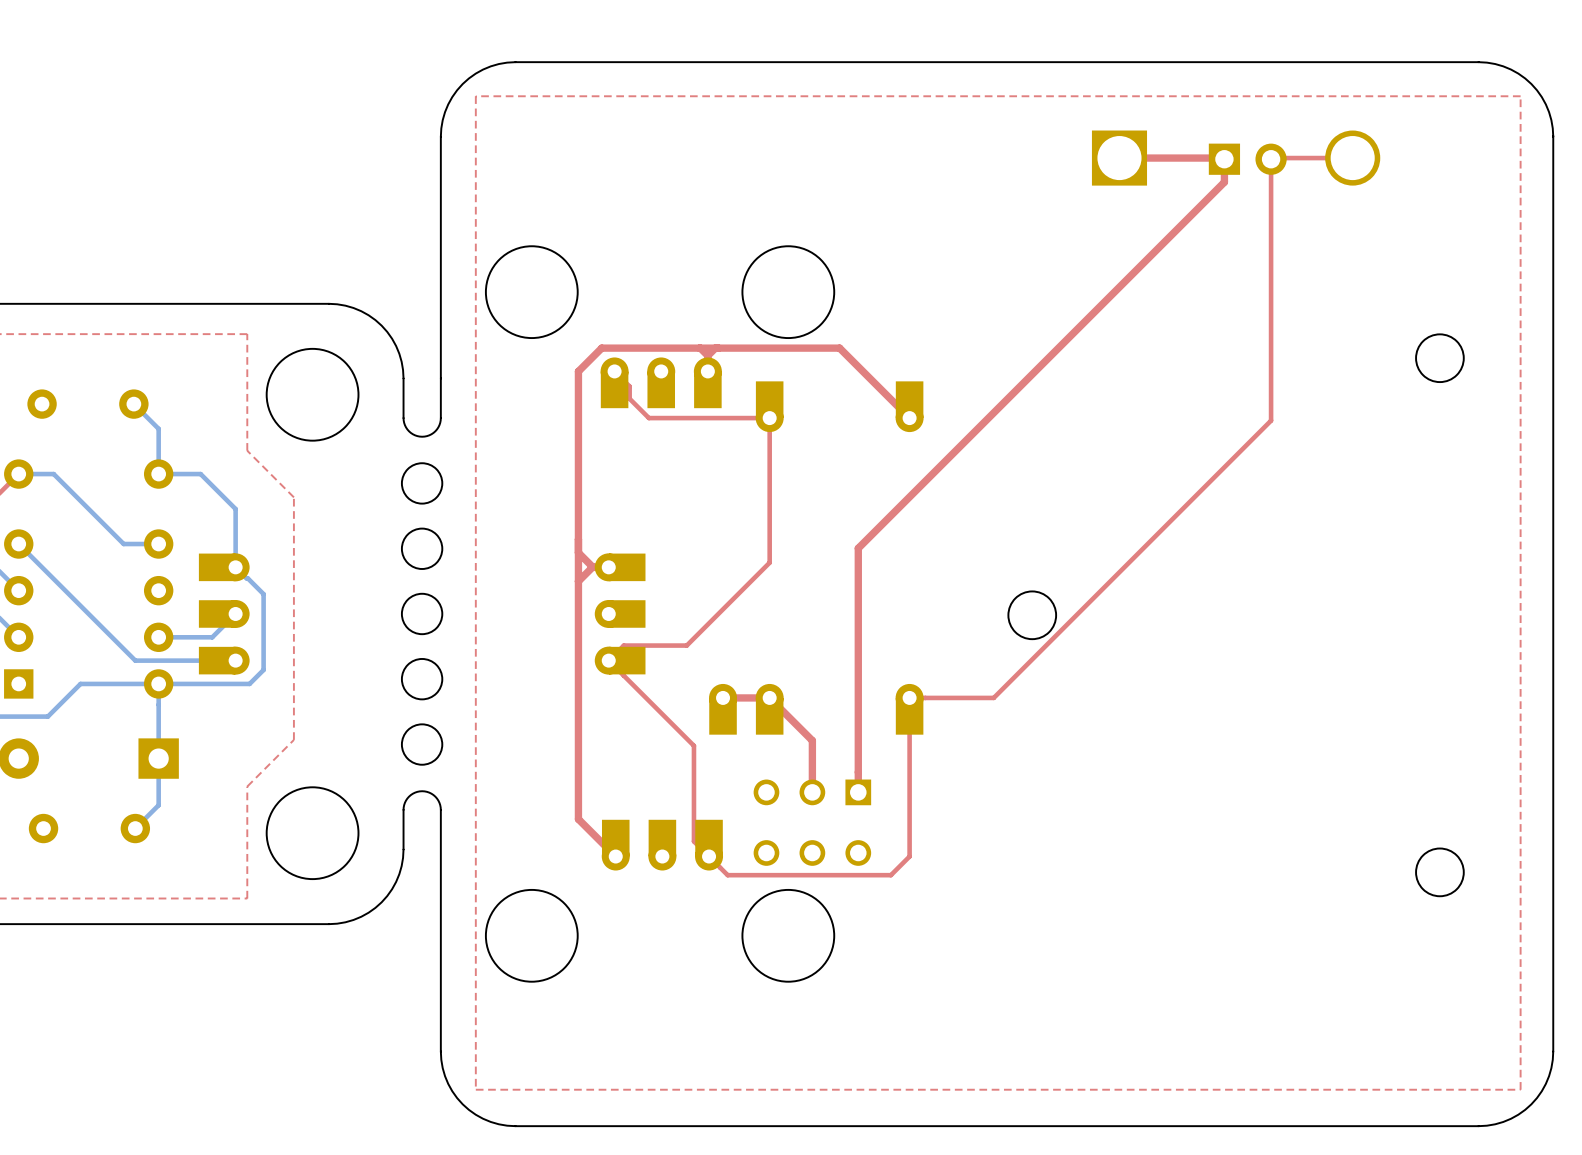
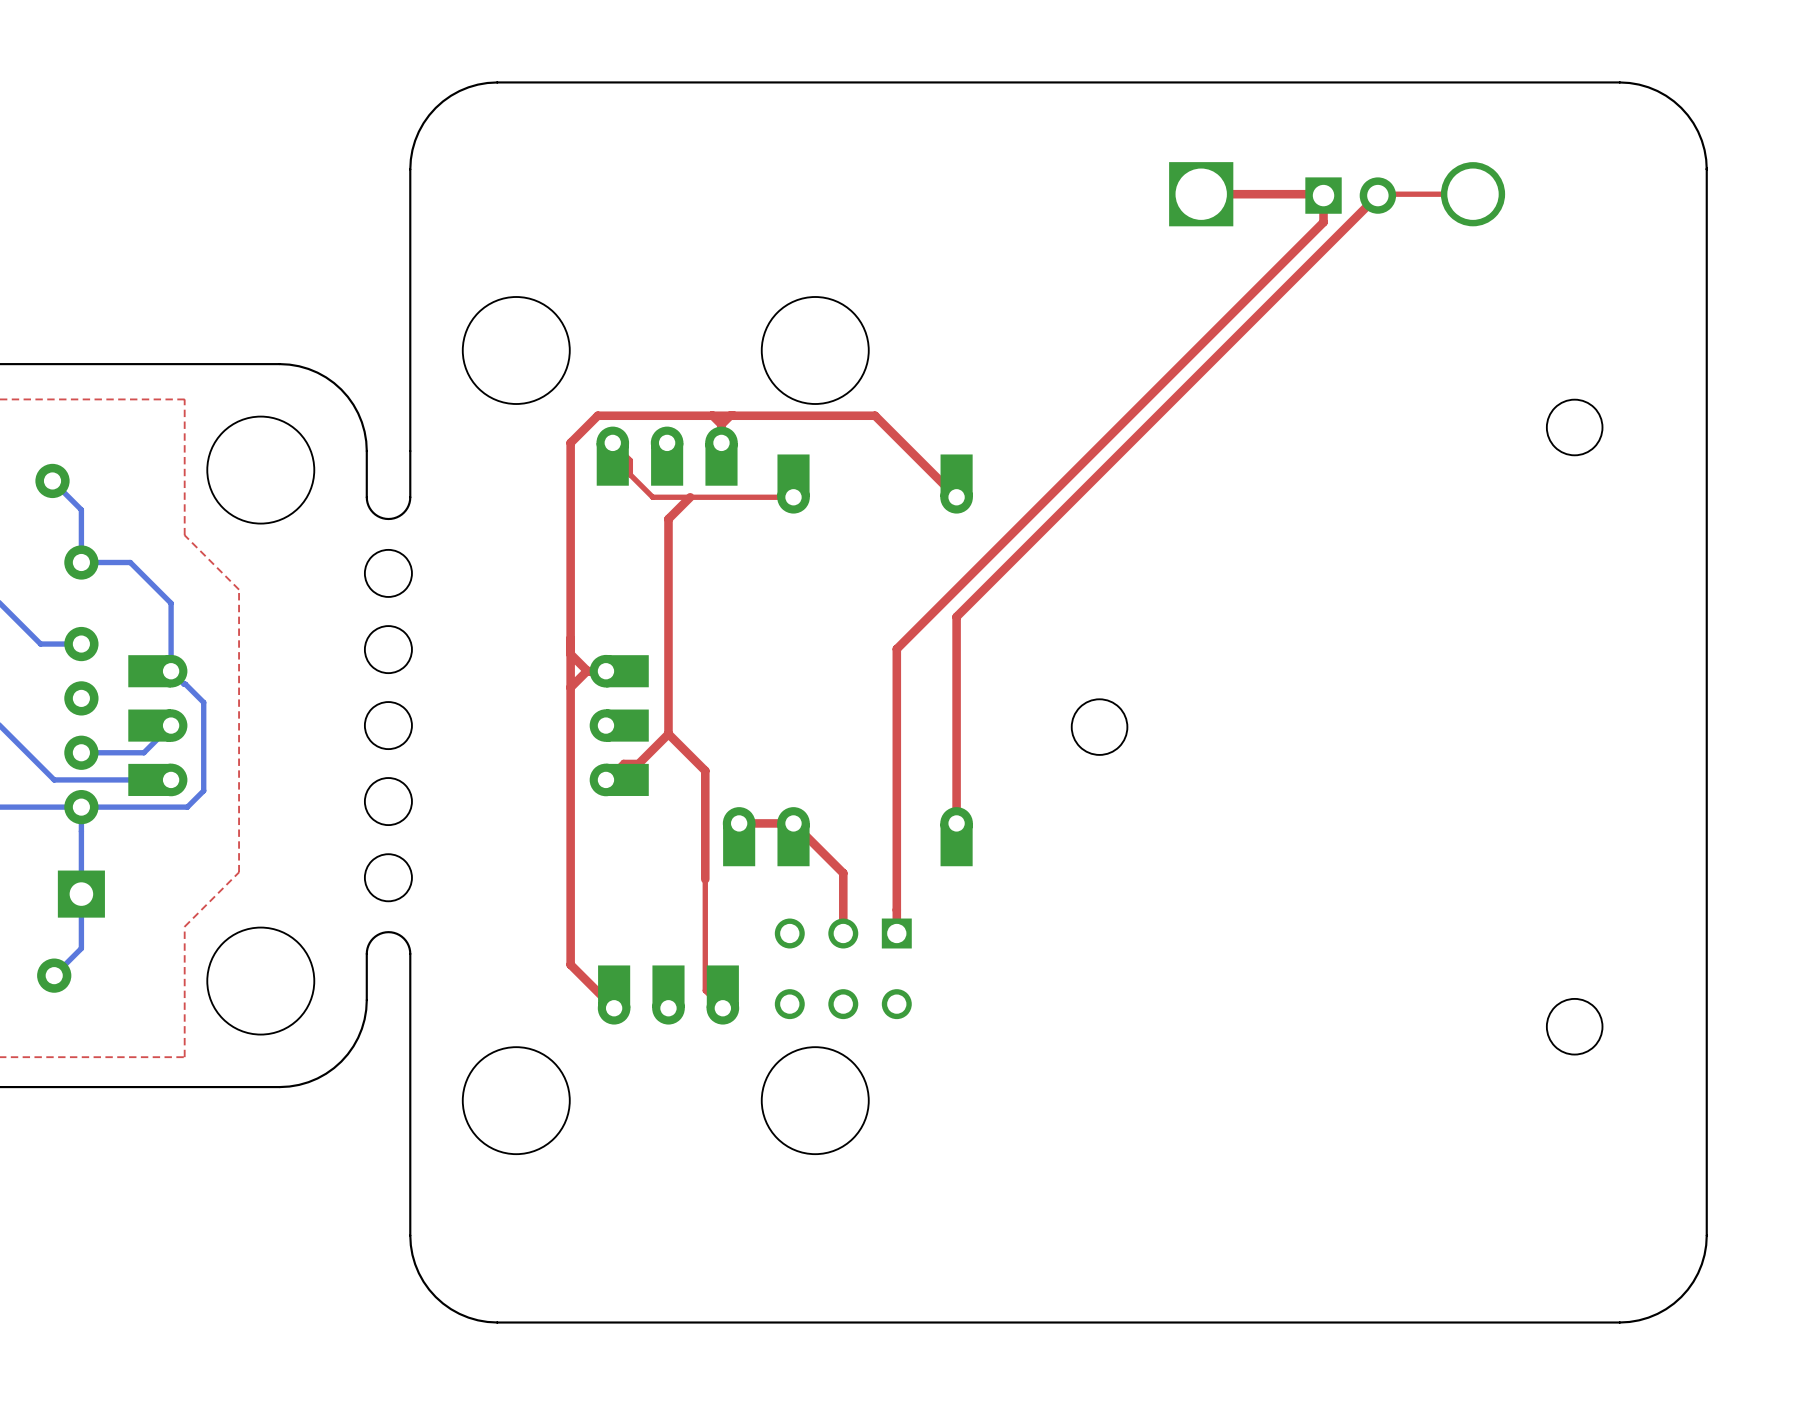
top zone outline: (1520, 96) (1520, 1089) (475, 1089) (475, 96) (1520, 96) -> none
top track: (1271, 159) (1271, 420) (993, 697) (909, 697) (909, 856) (890, 875) (727, 875) (709, 856) -> (1377, 195) (956, 616) (956, 812)
top track: none -> (690, 497) (668, 519) (668, 734)
top track: (769, 418) (769, 562) (686, 645) (638, 645) -> (668, 734) (640, 762)
top track: (608, 660) (693, 745) -> (668, 734) (705, 770) (705, 879)

